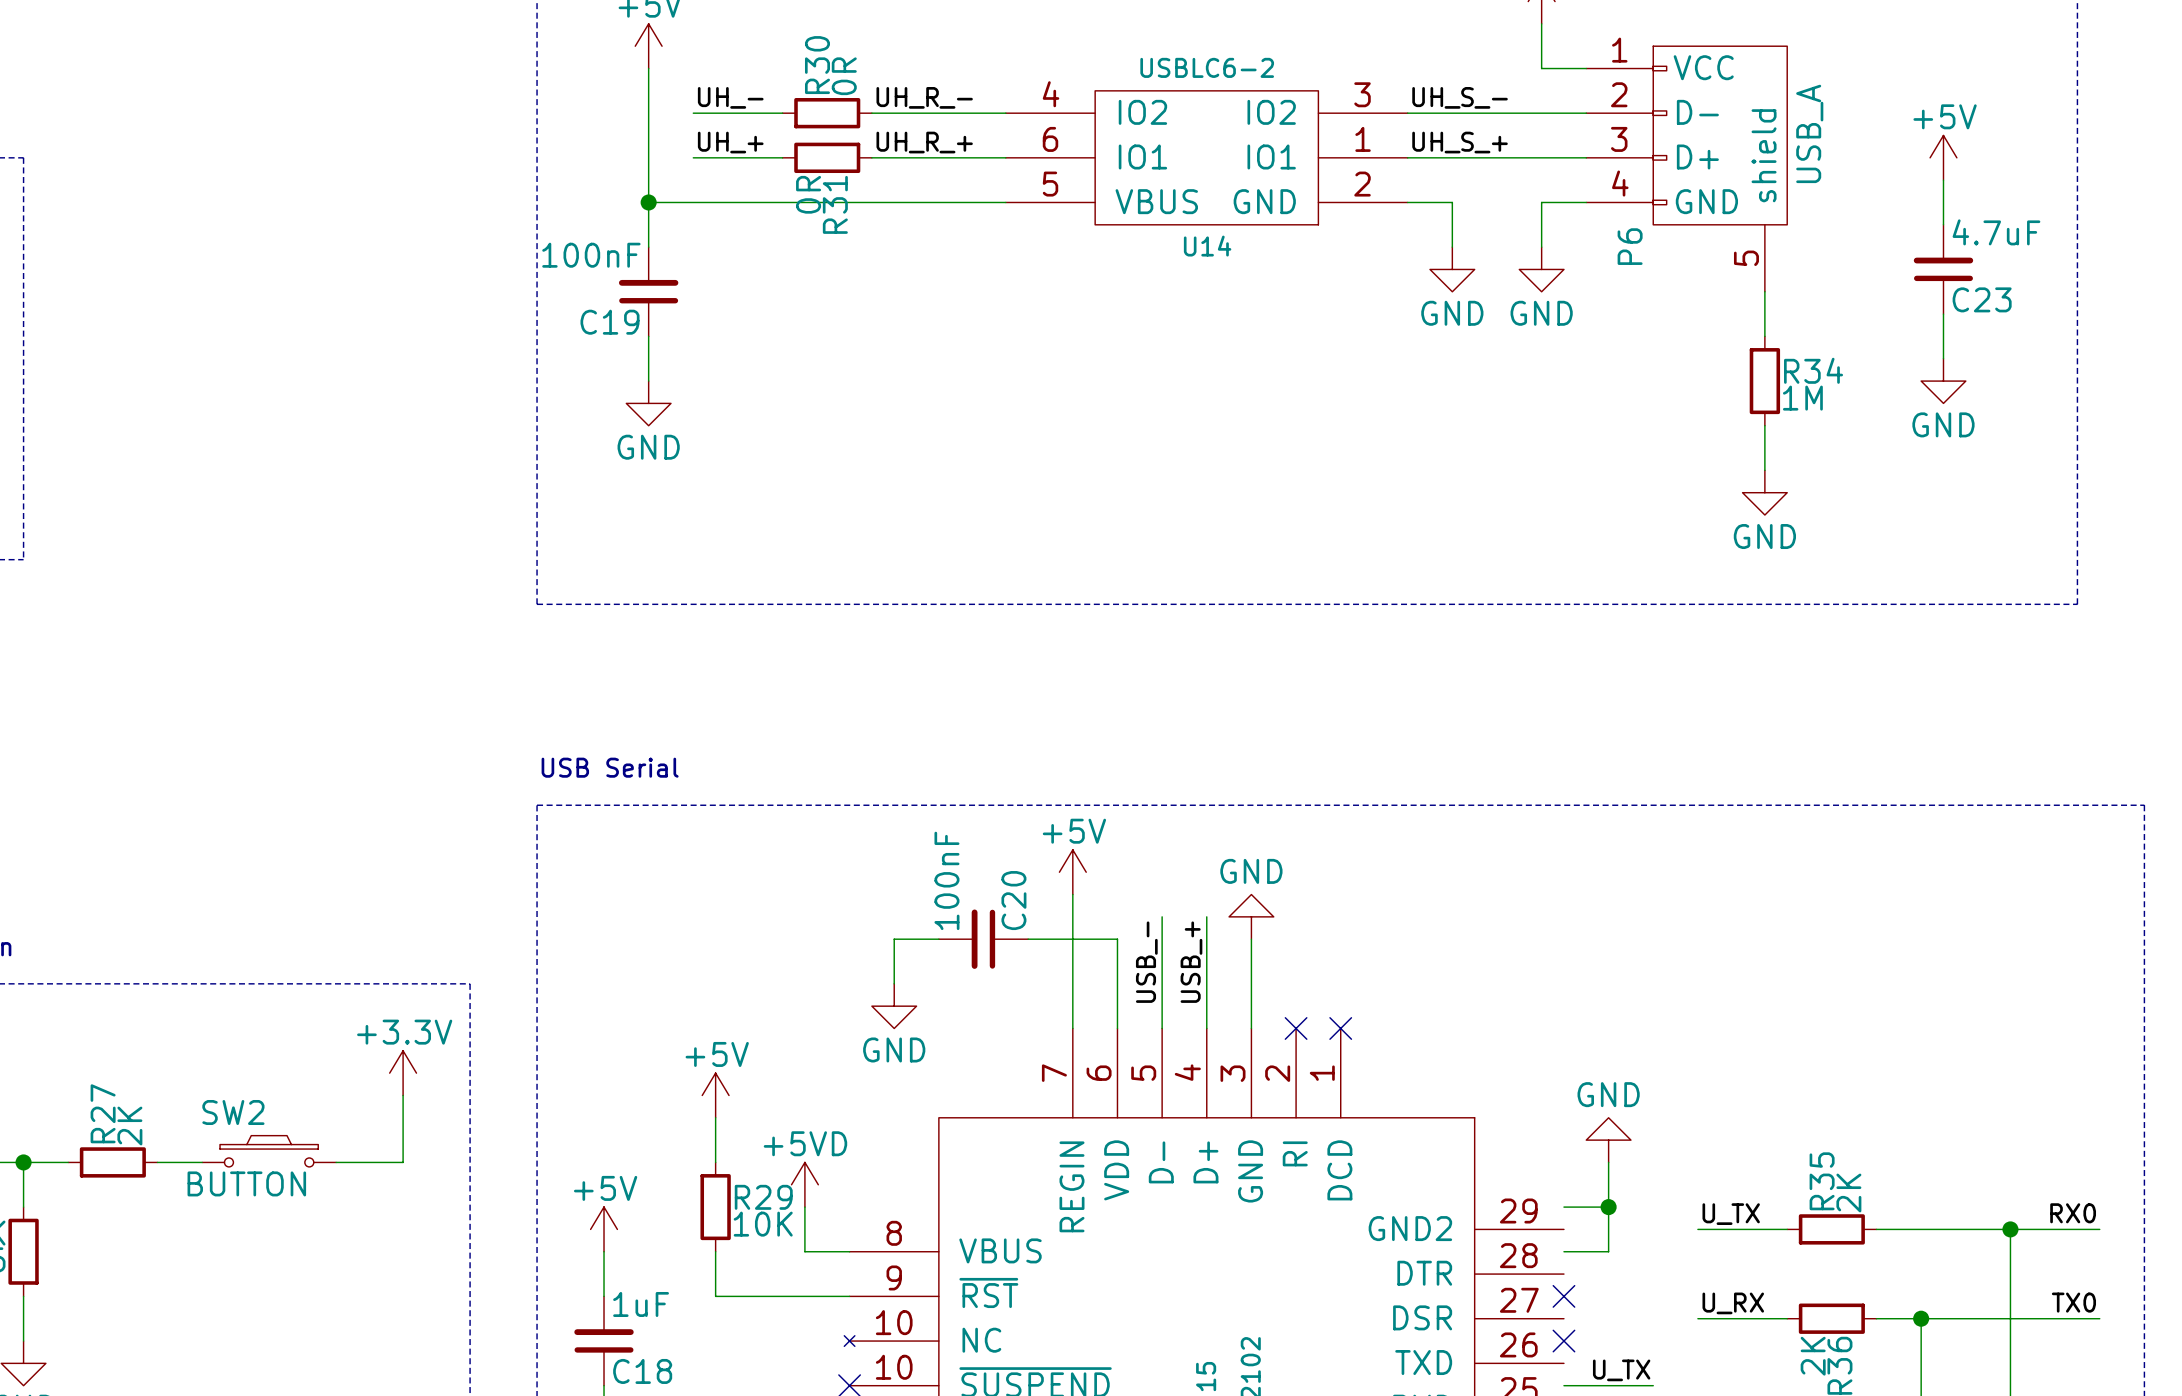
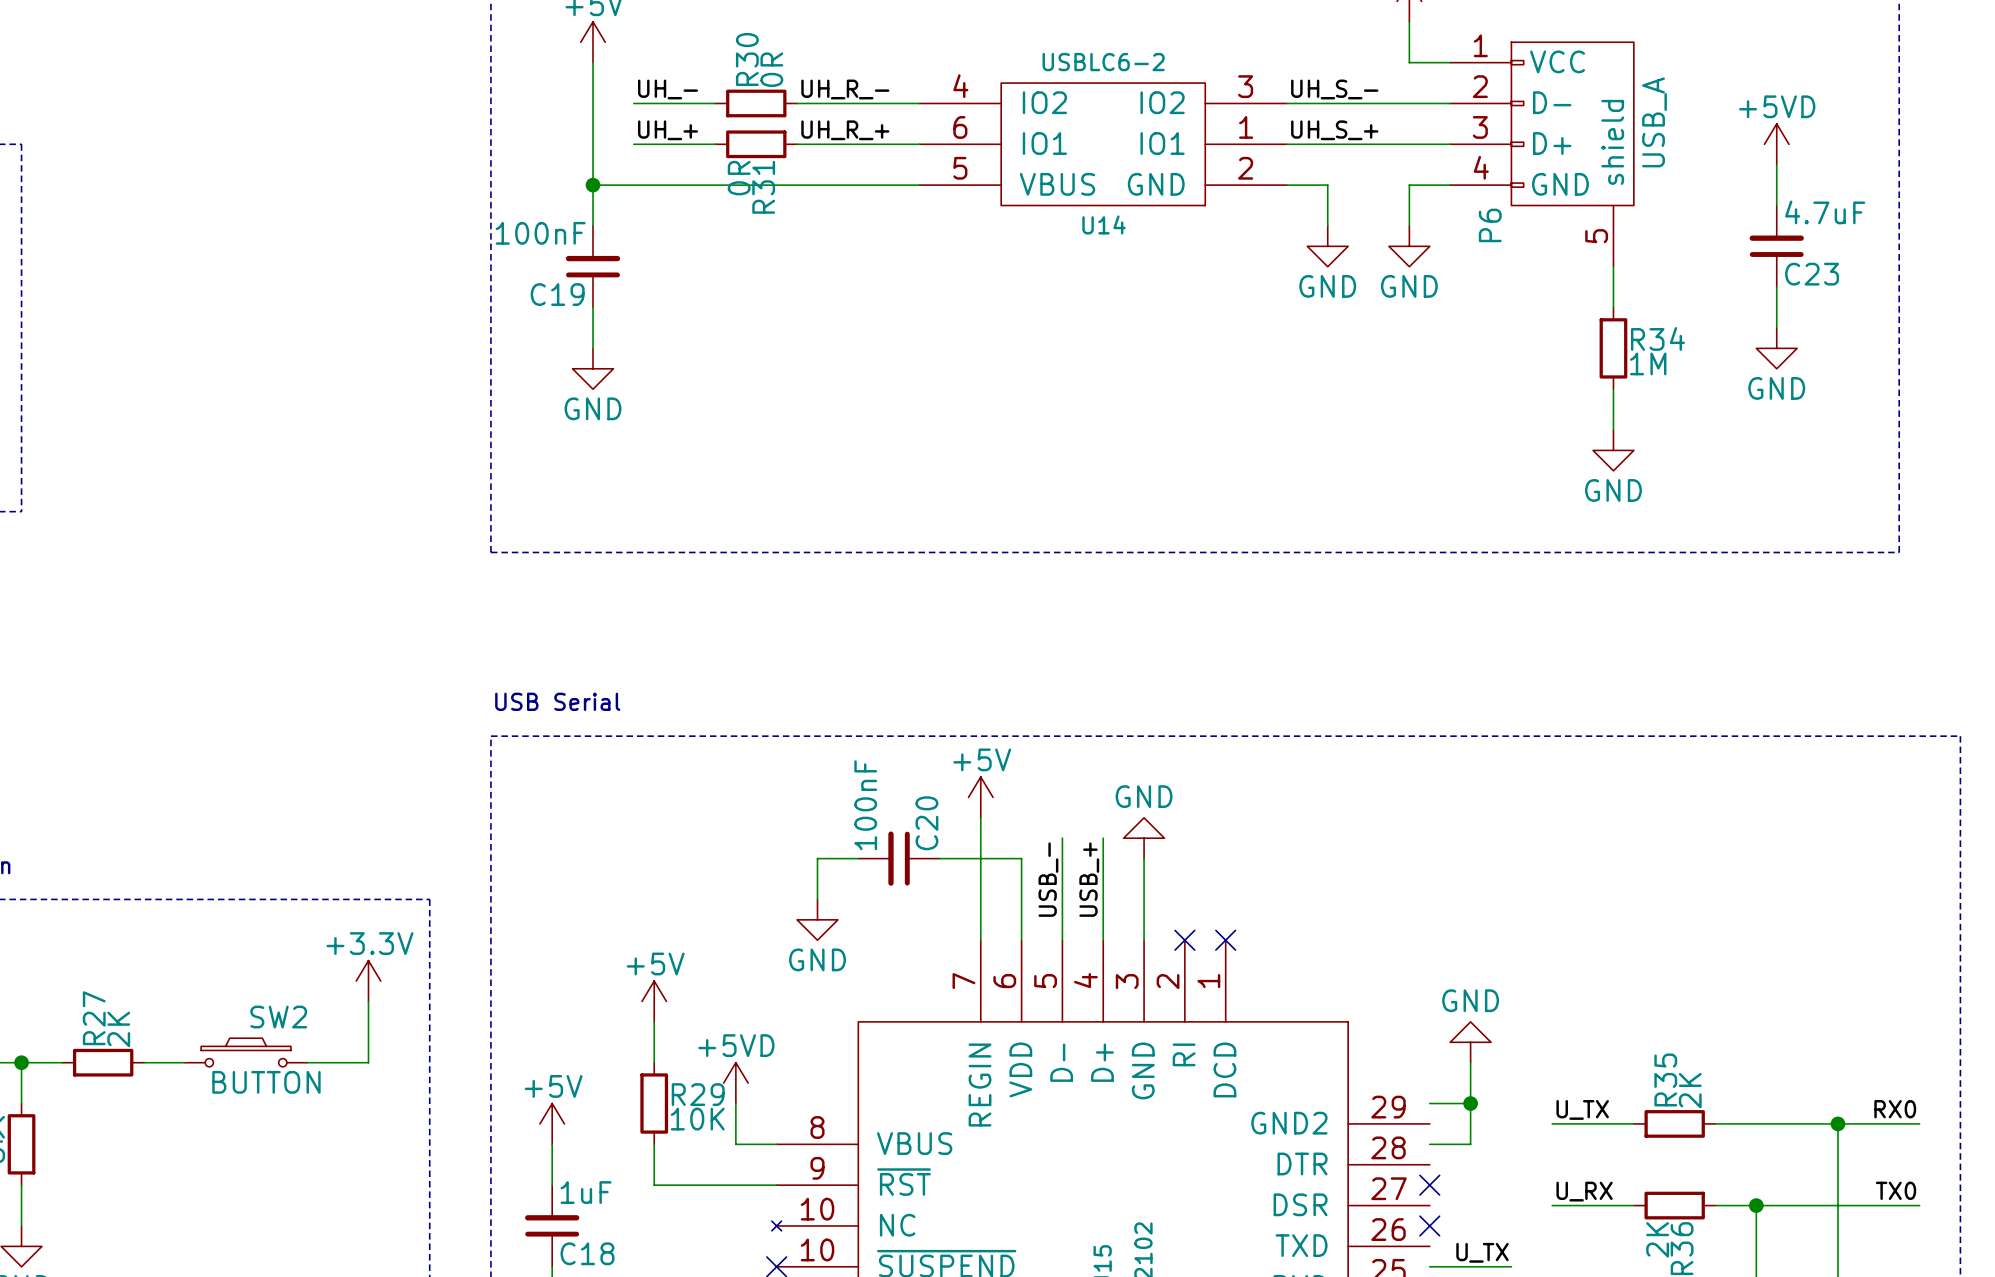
power symbol: +5V (1943, 157) -> +5VD (1776, 144)
SW2 name position: SW2 (233, 1112) -> SW2 (278, 1017)
SW2 value position: BUTTON (246, 1183) -> BUTTON (266, 1082)

